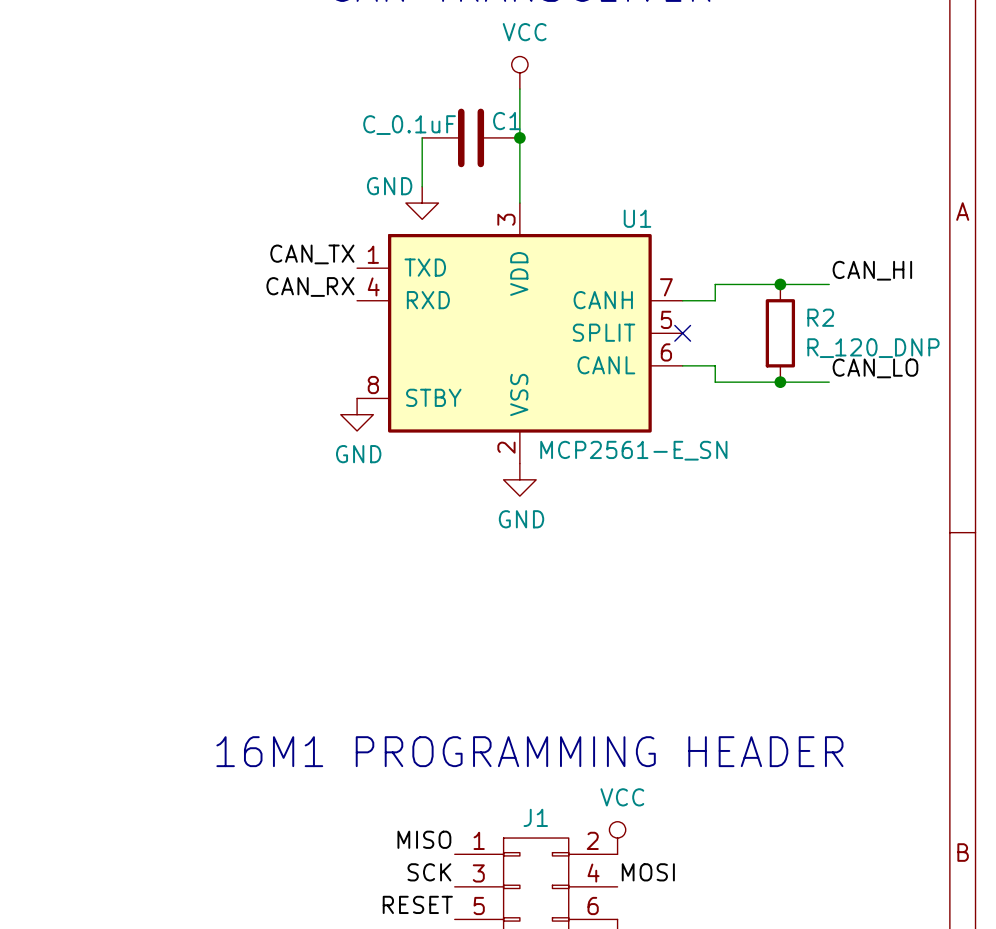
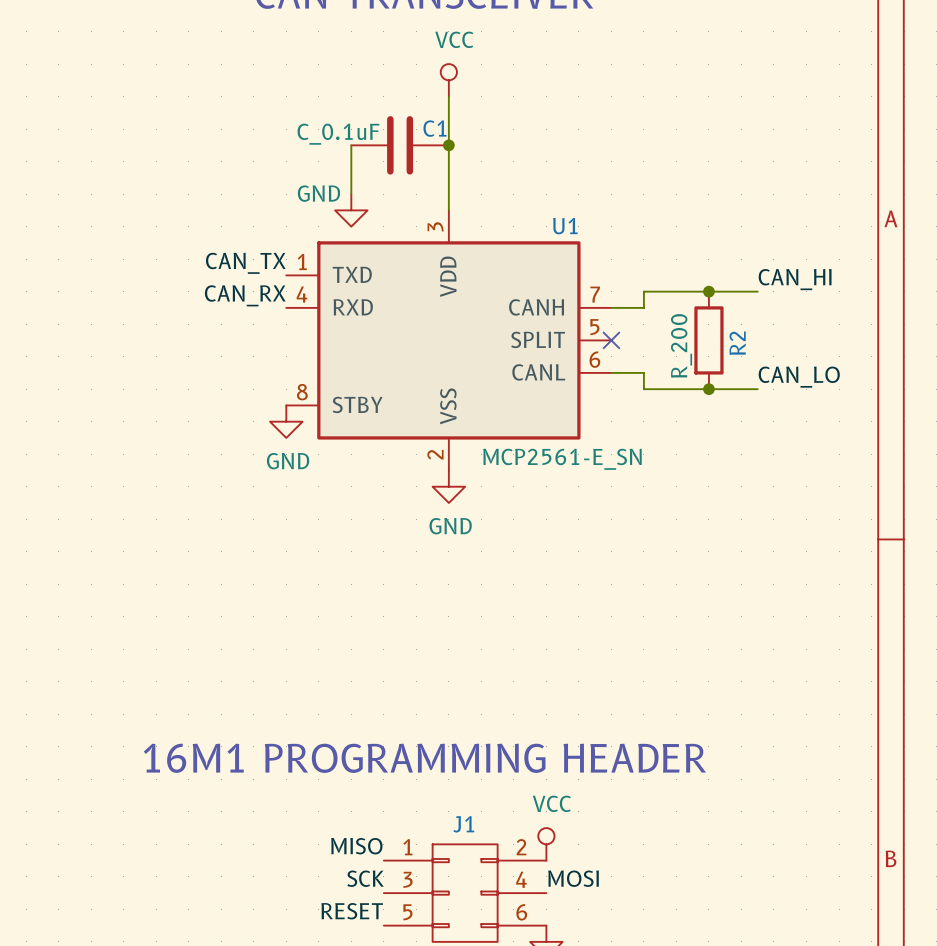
R2 name rotation: 0° (820, 317) -> 90° counterclockwise (737, 343)
R2 value: R_120_DNP (873, 348) -> R_200 (681, 345)

